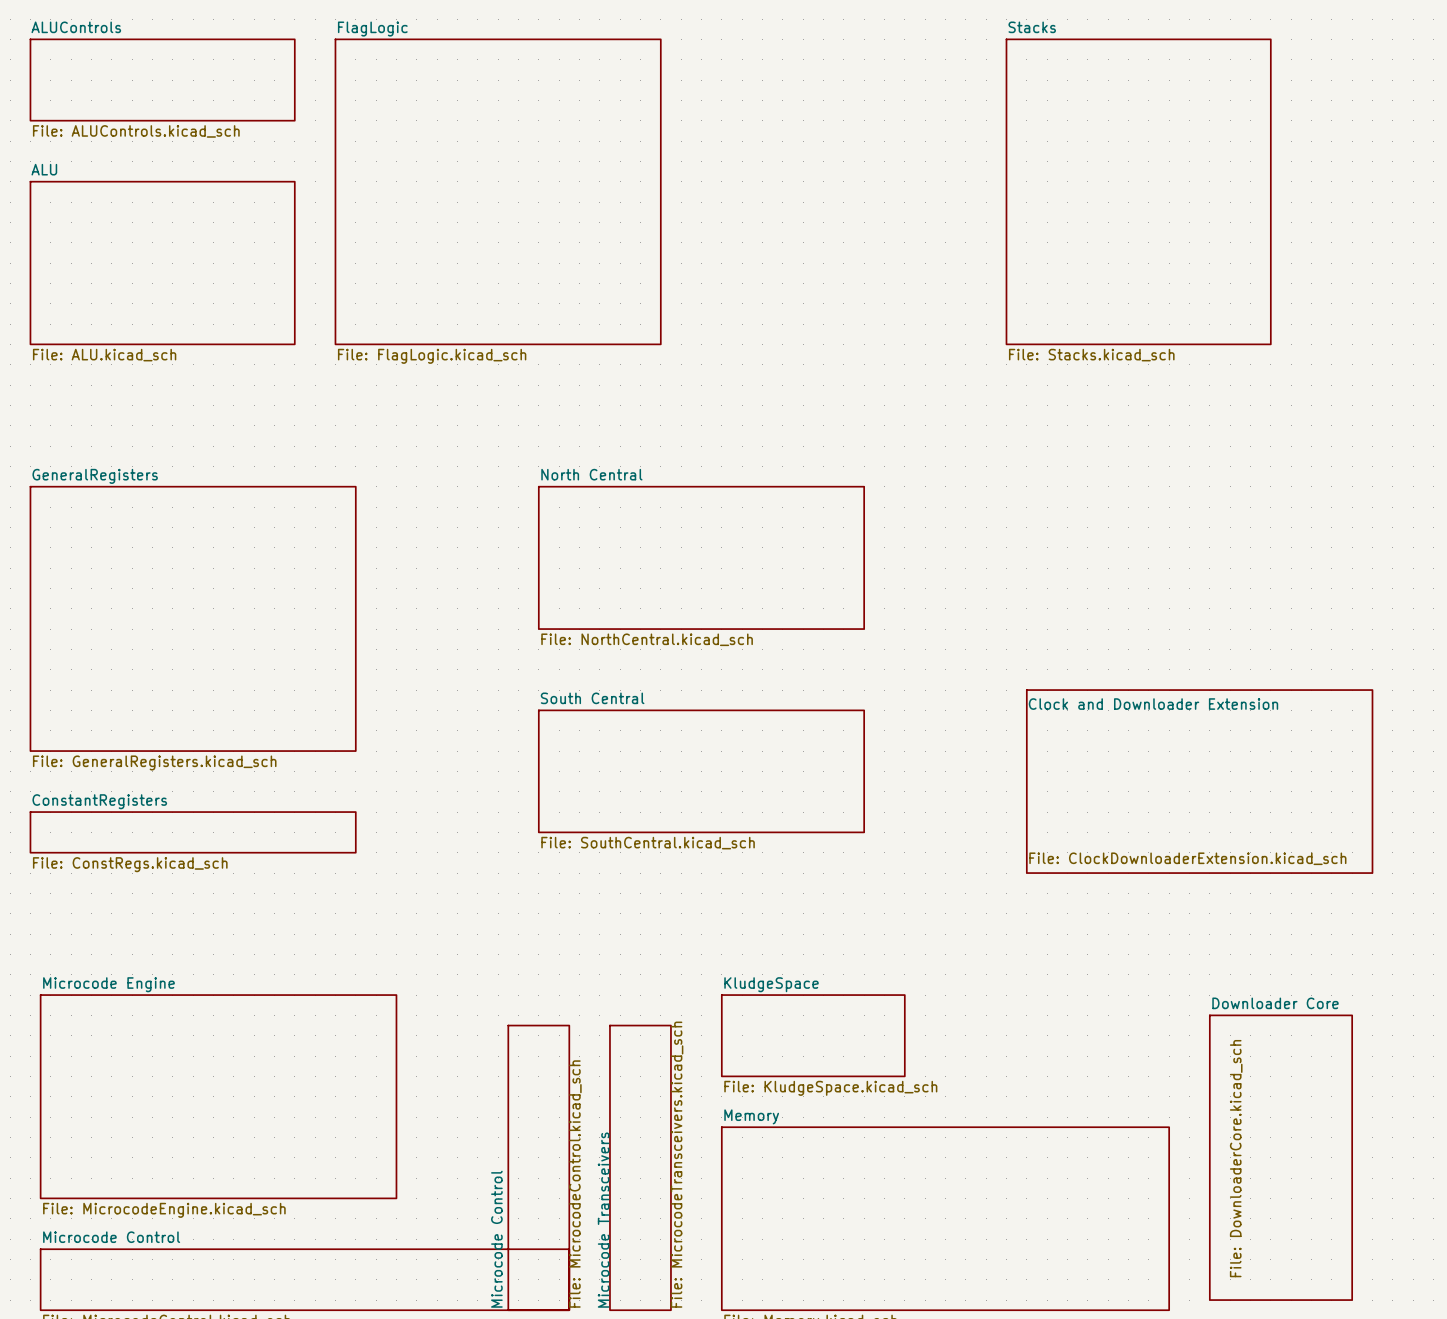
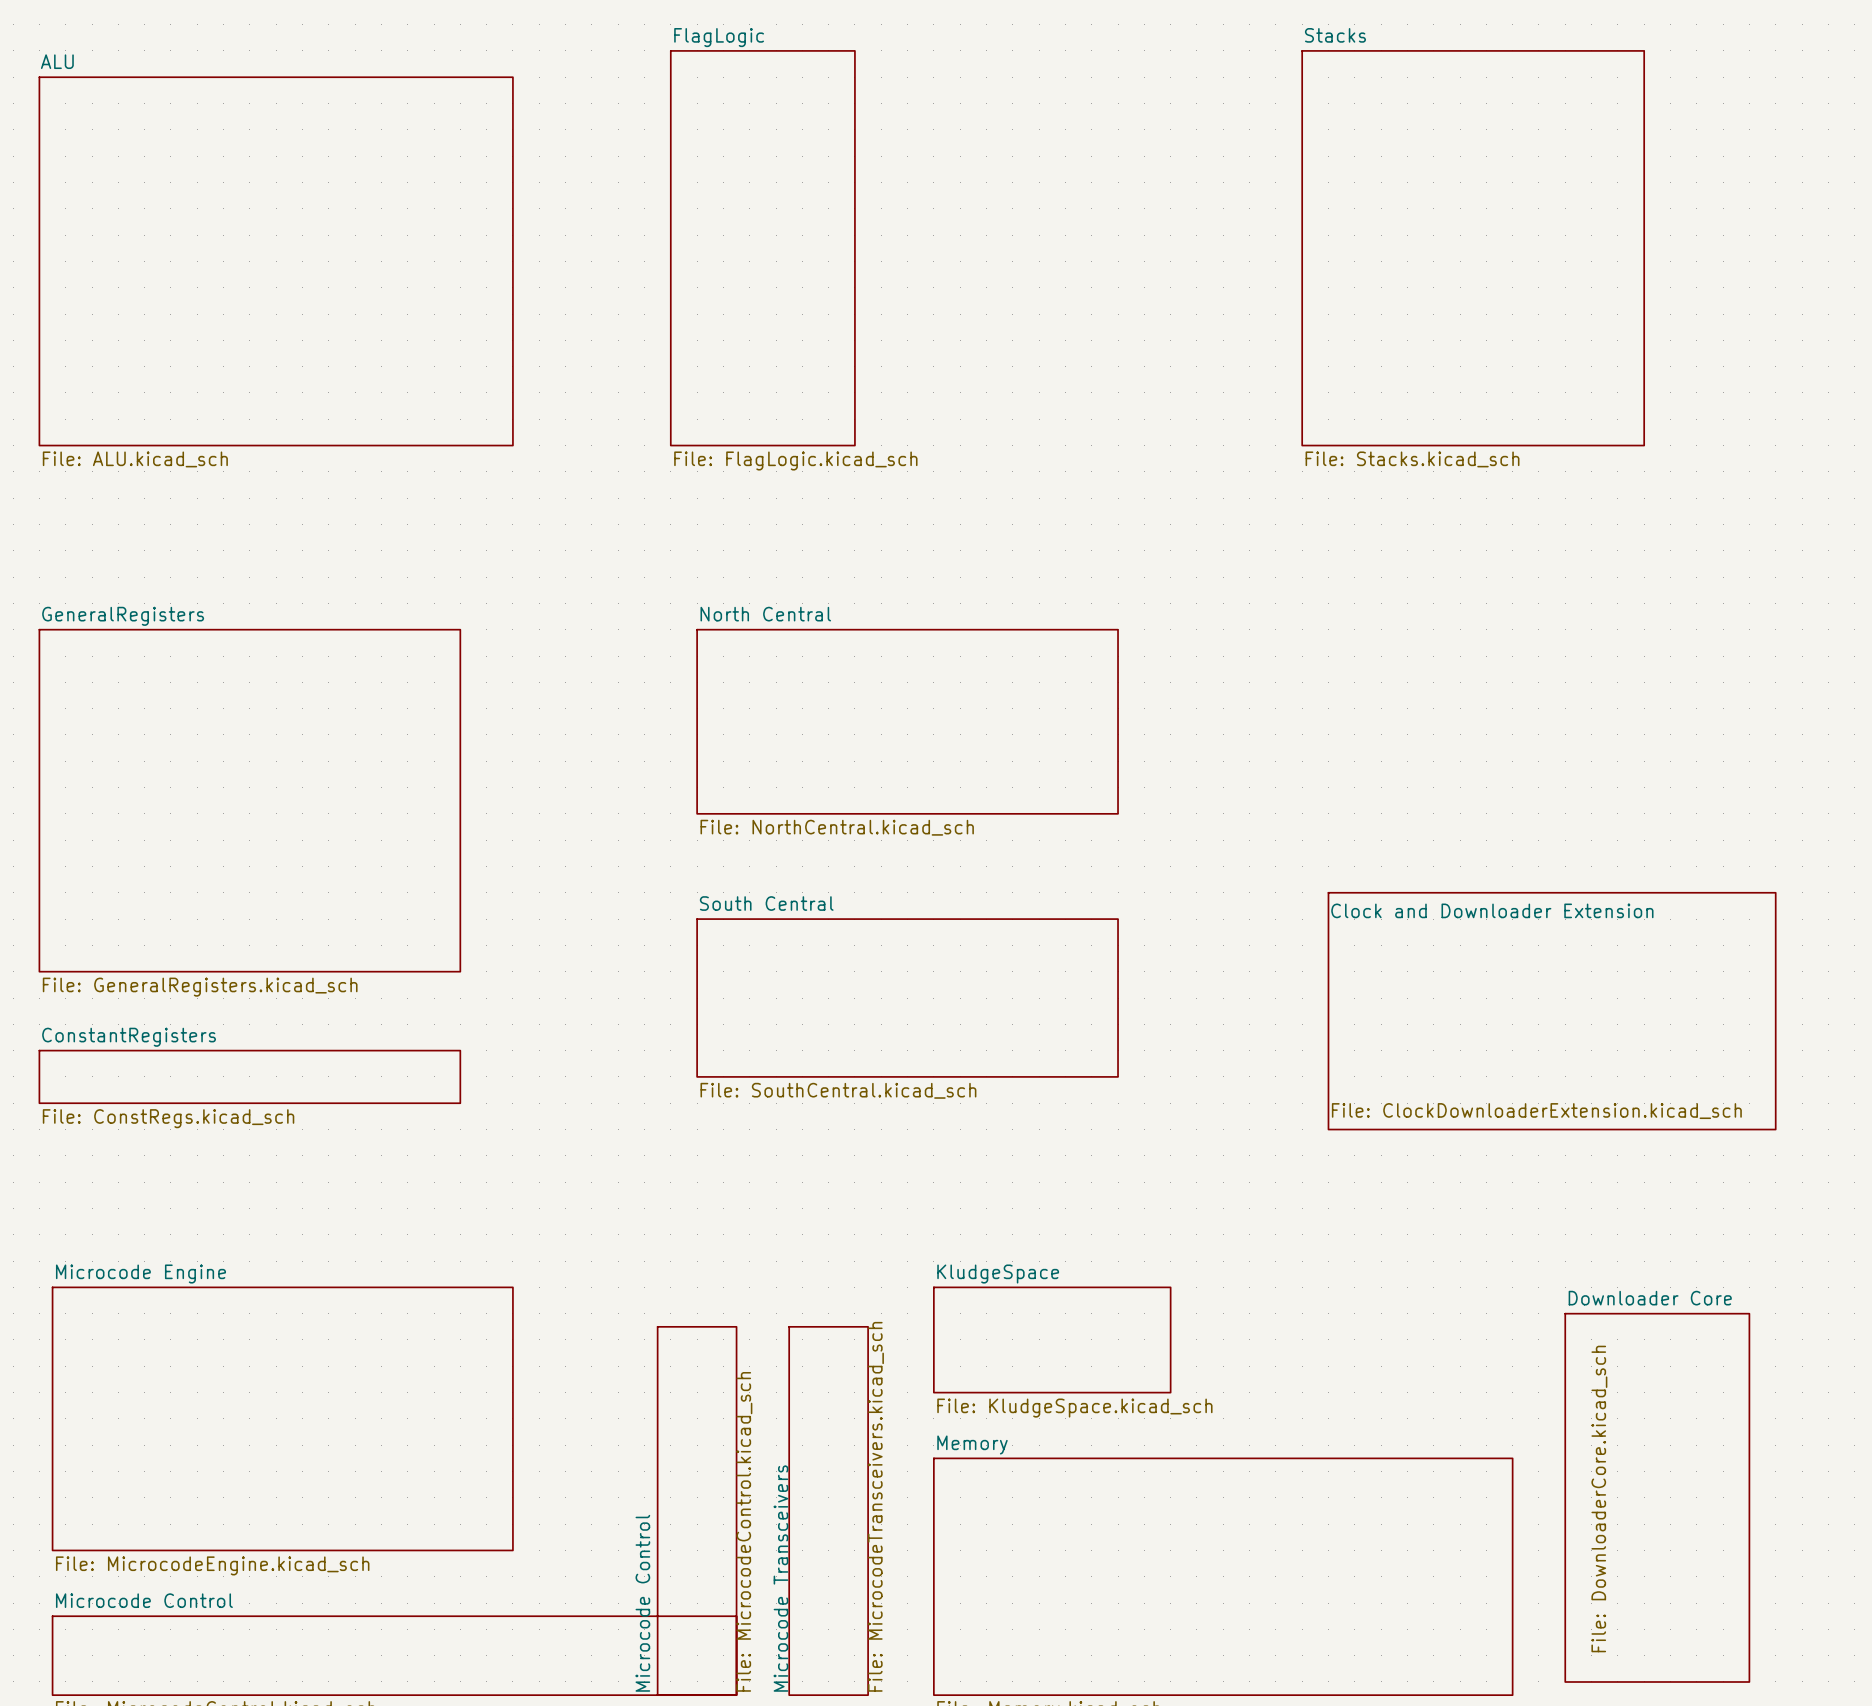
sheet ALUControls: File: ALUControls.kicad_sch (162, 80) -> none
sheet FlagLogic: File: FlagLogic.kicad_sch (498, 191) -> none
sheet FlagLogic: none -> File: FlagLogic.kicad_sch (762, 248)
sheet ALU: none -> File: ALU.kicad_sch (276, 261)
sheet ALU: File: ALU.kicad_sch (162, 263) -> none

